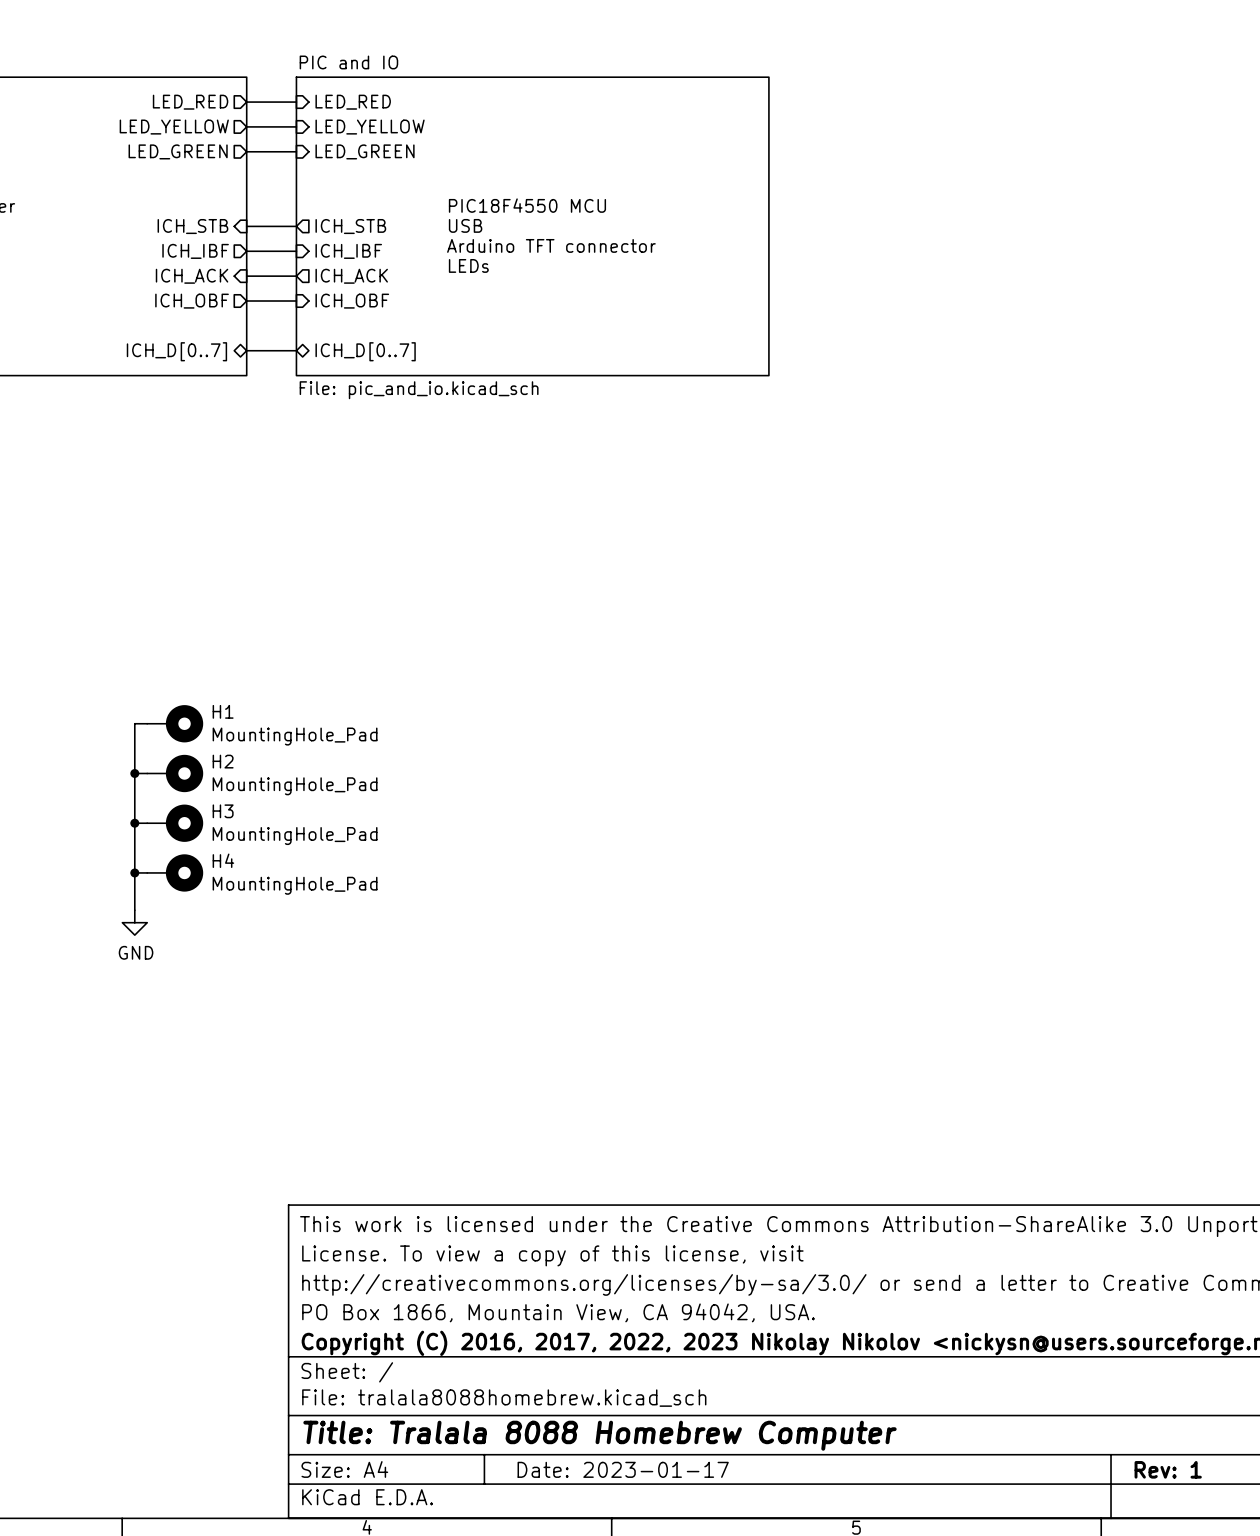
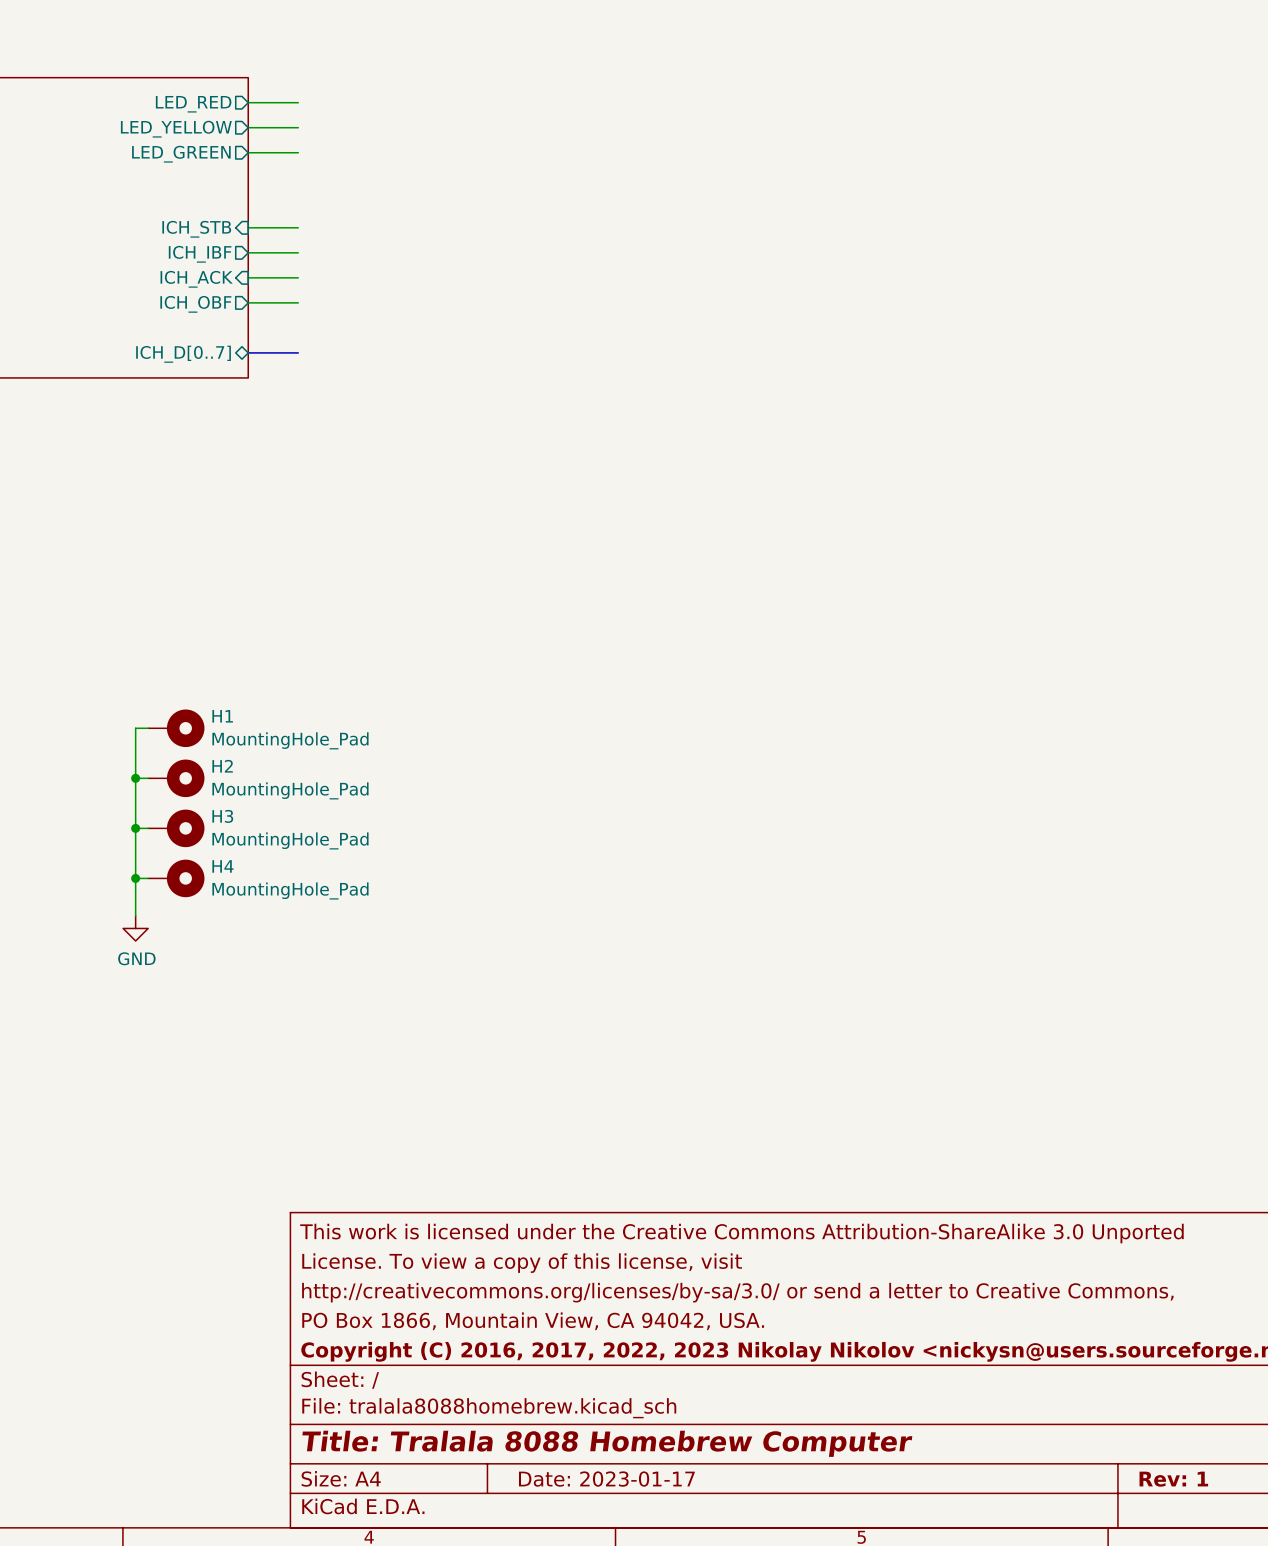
sheet pin: LED_RED (353, 102) -> none
sheet pin: LED_YELLOW (370, 127) -> none
sheet pin: LED_GREEN (365, 151) -> none
text: PIC18F4550 MCU (527, 205) -> none
text: USB (465, 225) -> none
sheet pin: ICH_STB (350, 226) -> none
sheet PIC and IO: File: pic_and_io.kicad_sch (532, 226) -> none
text: Arduino TFT connector (551, 245) -> none
sheet pin: ICH_IBF (348, 251) -> none
text: LEDs (468, 265) -> none
sheet pin: ICH_ACK (351, 276) -> none
sheet pin: ICH_OBF (352, 301) -> none
sheet pin: ICH_D[0..7] (365, 351) -> none

